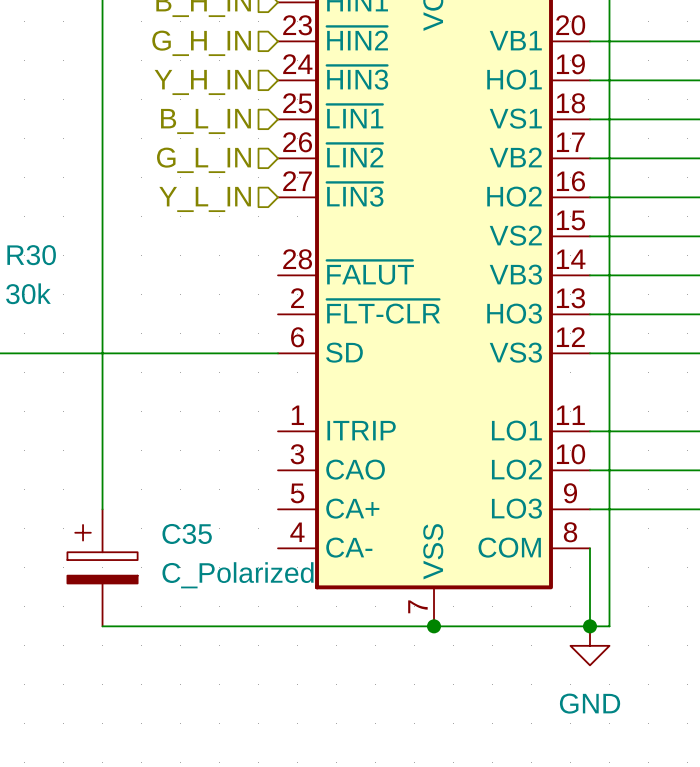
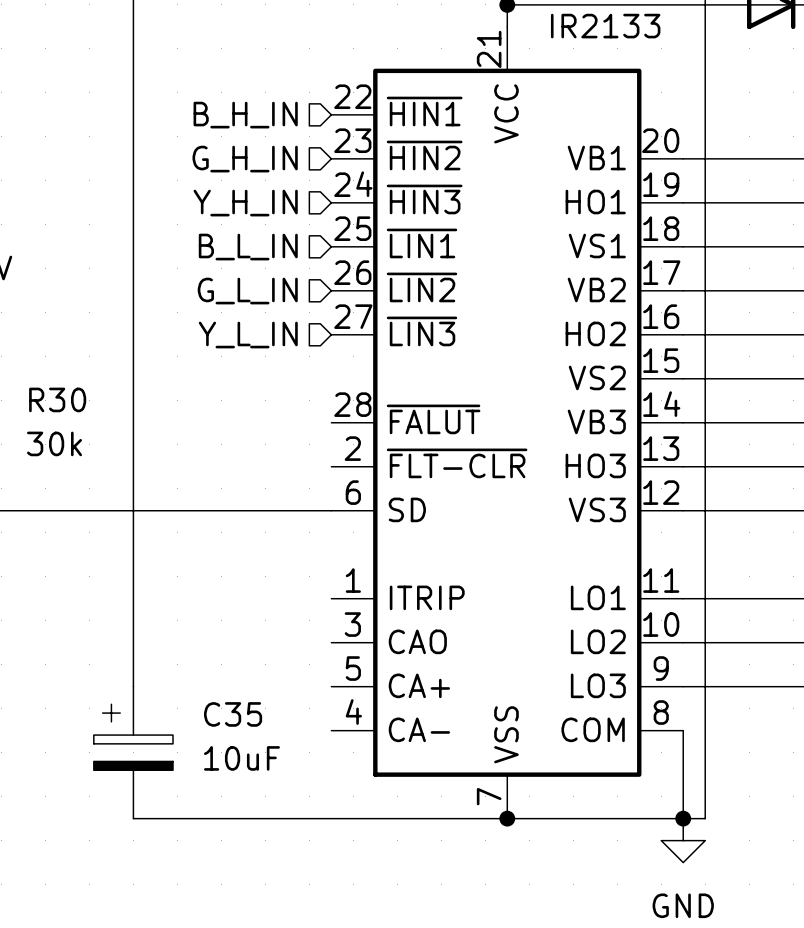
C35 value: C_Polarized (238, 575) -> 10uF (241, 758)

